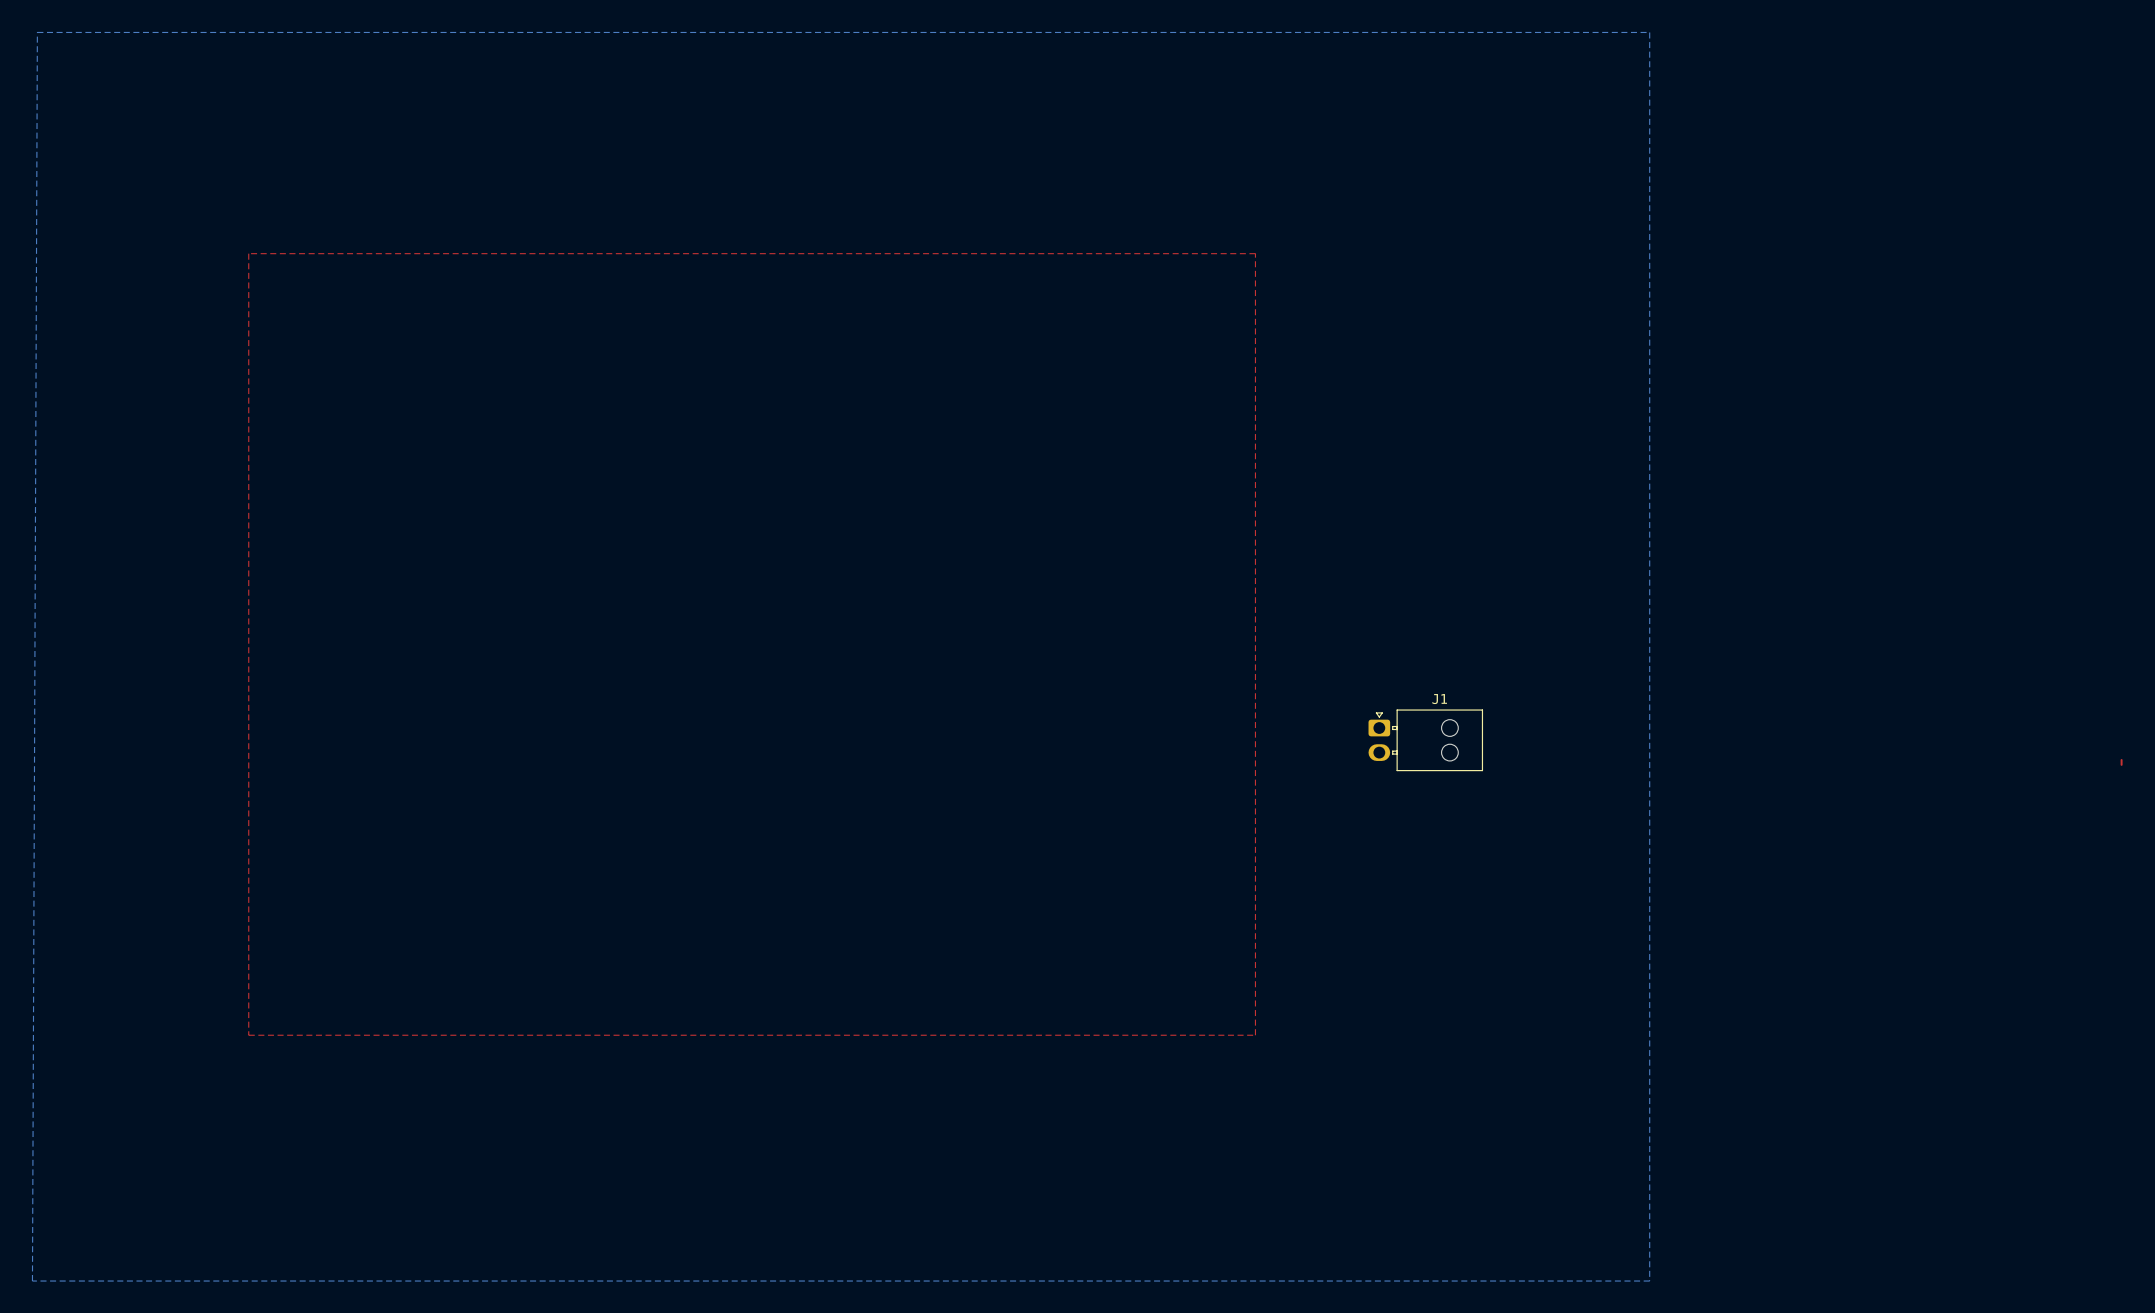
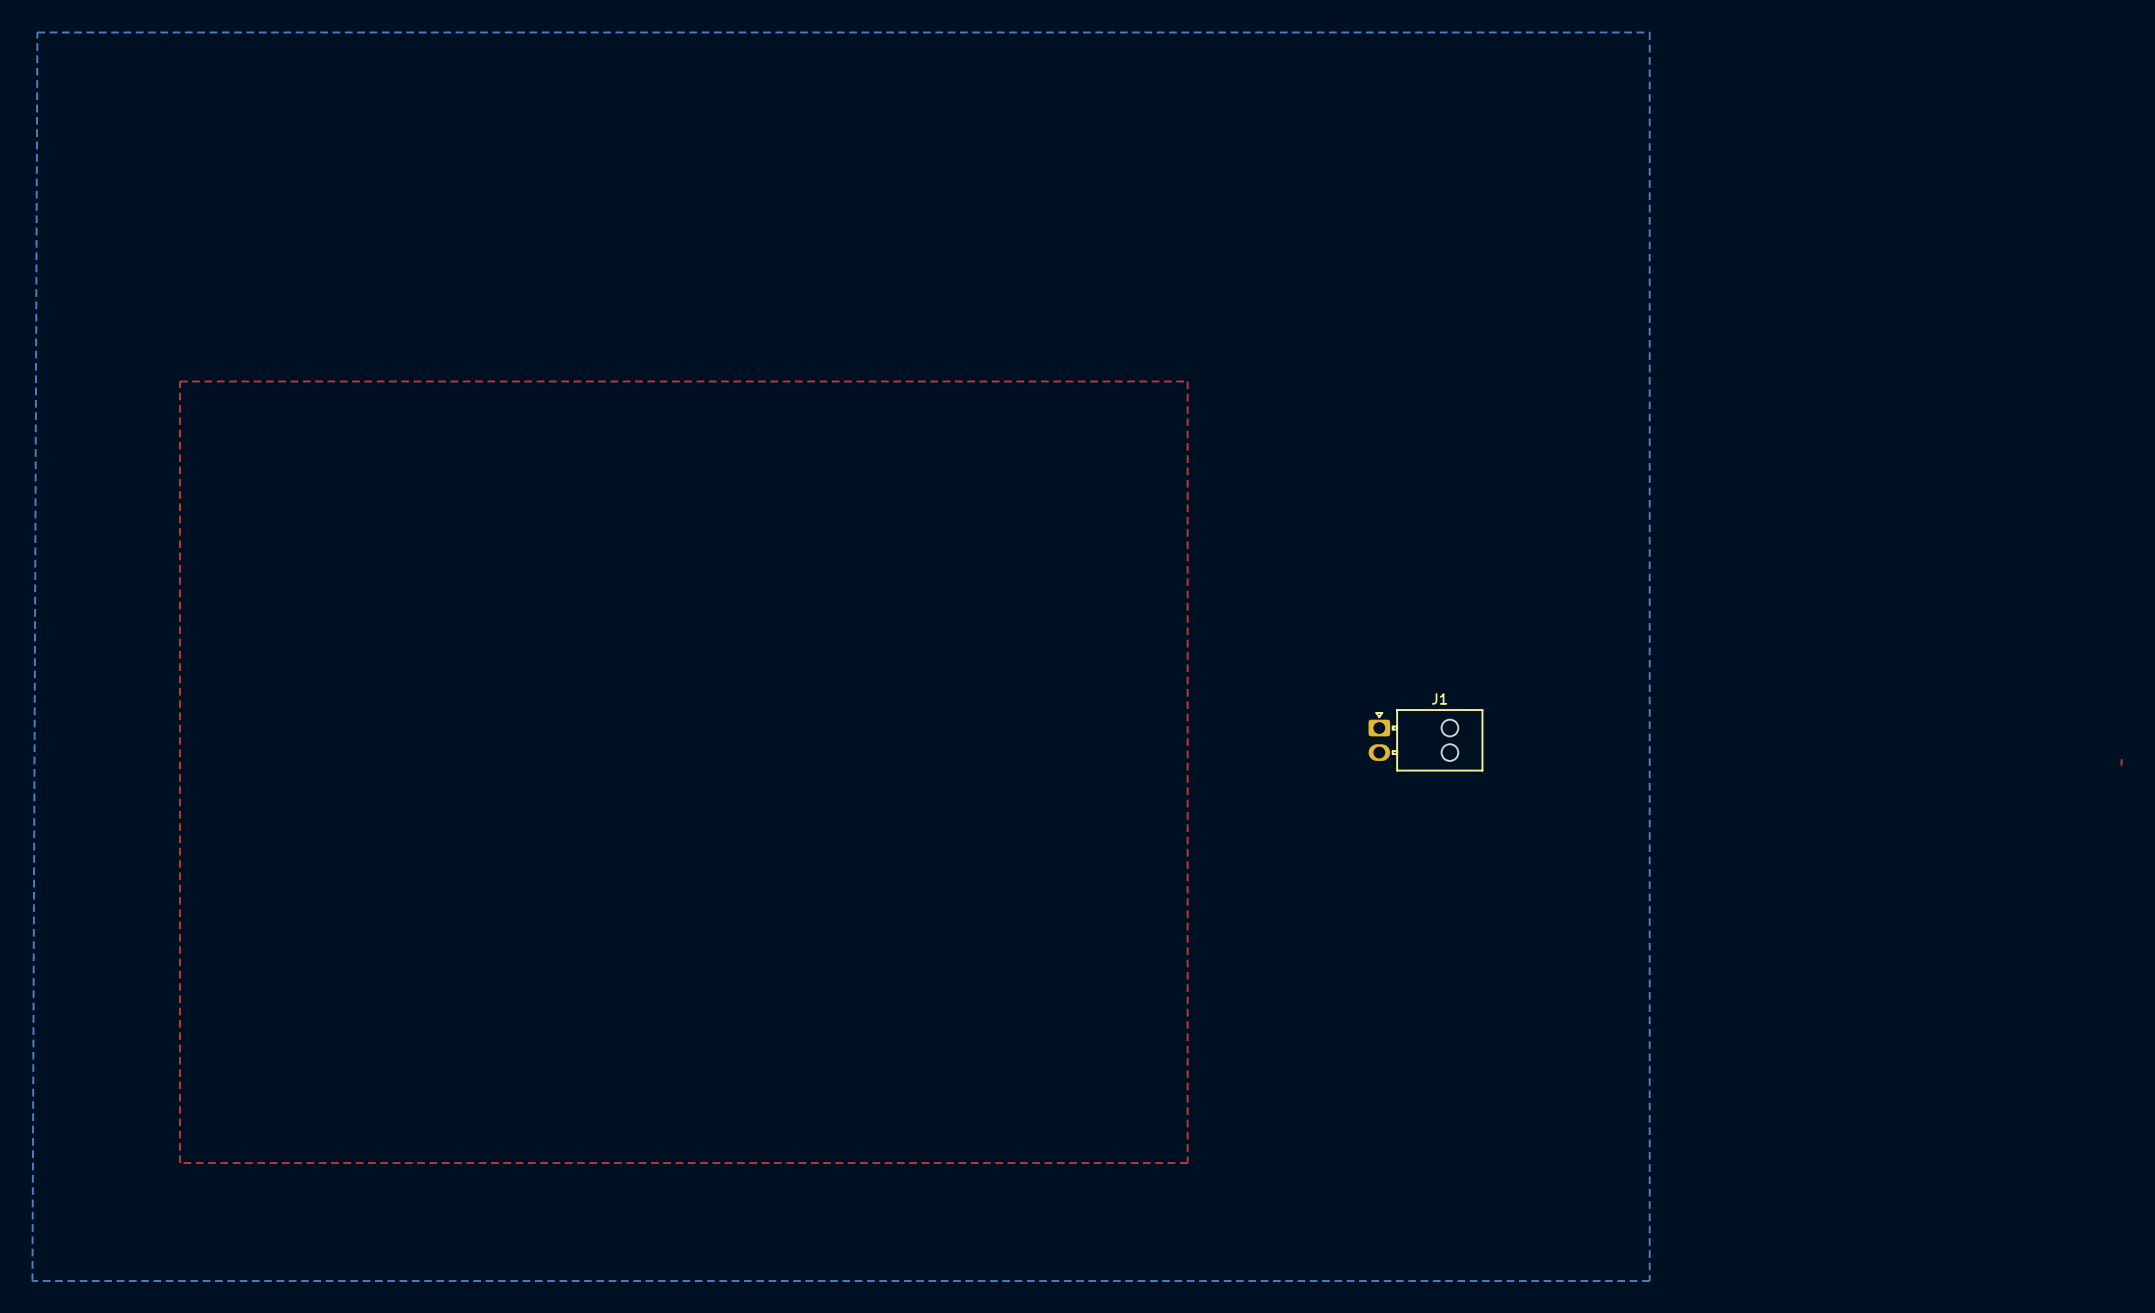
top zone outline: (248, 253) (1255, 253) (1255, 1035) (248, 1035) (248, 253) -> (179, 381) (179, 1163) (1187, 1163) (1187, 381) (179, 381)

